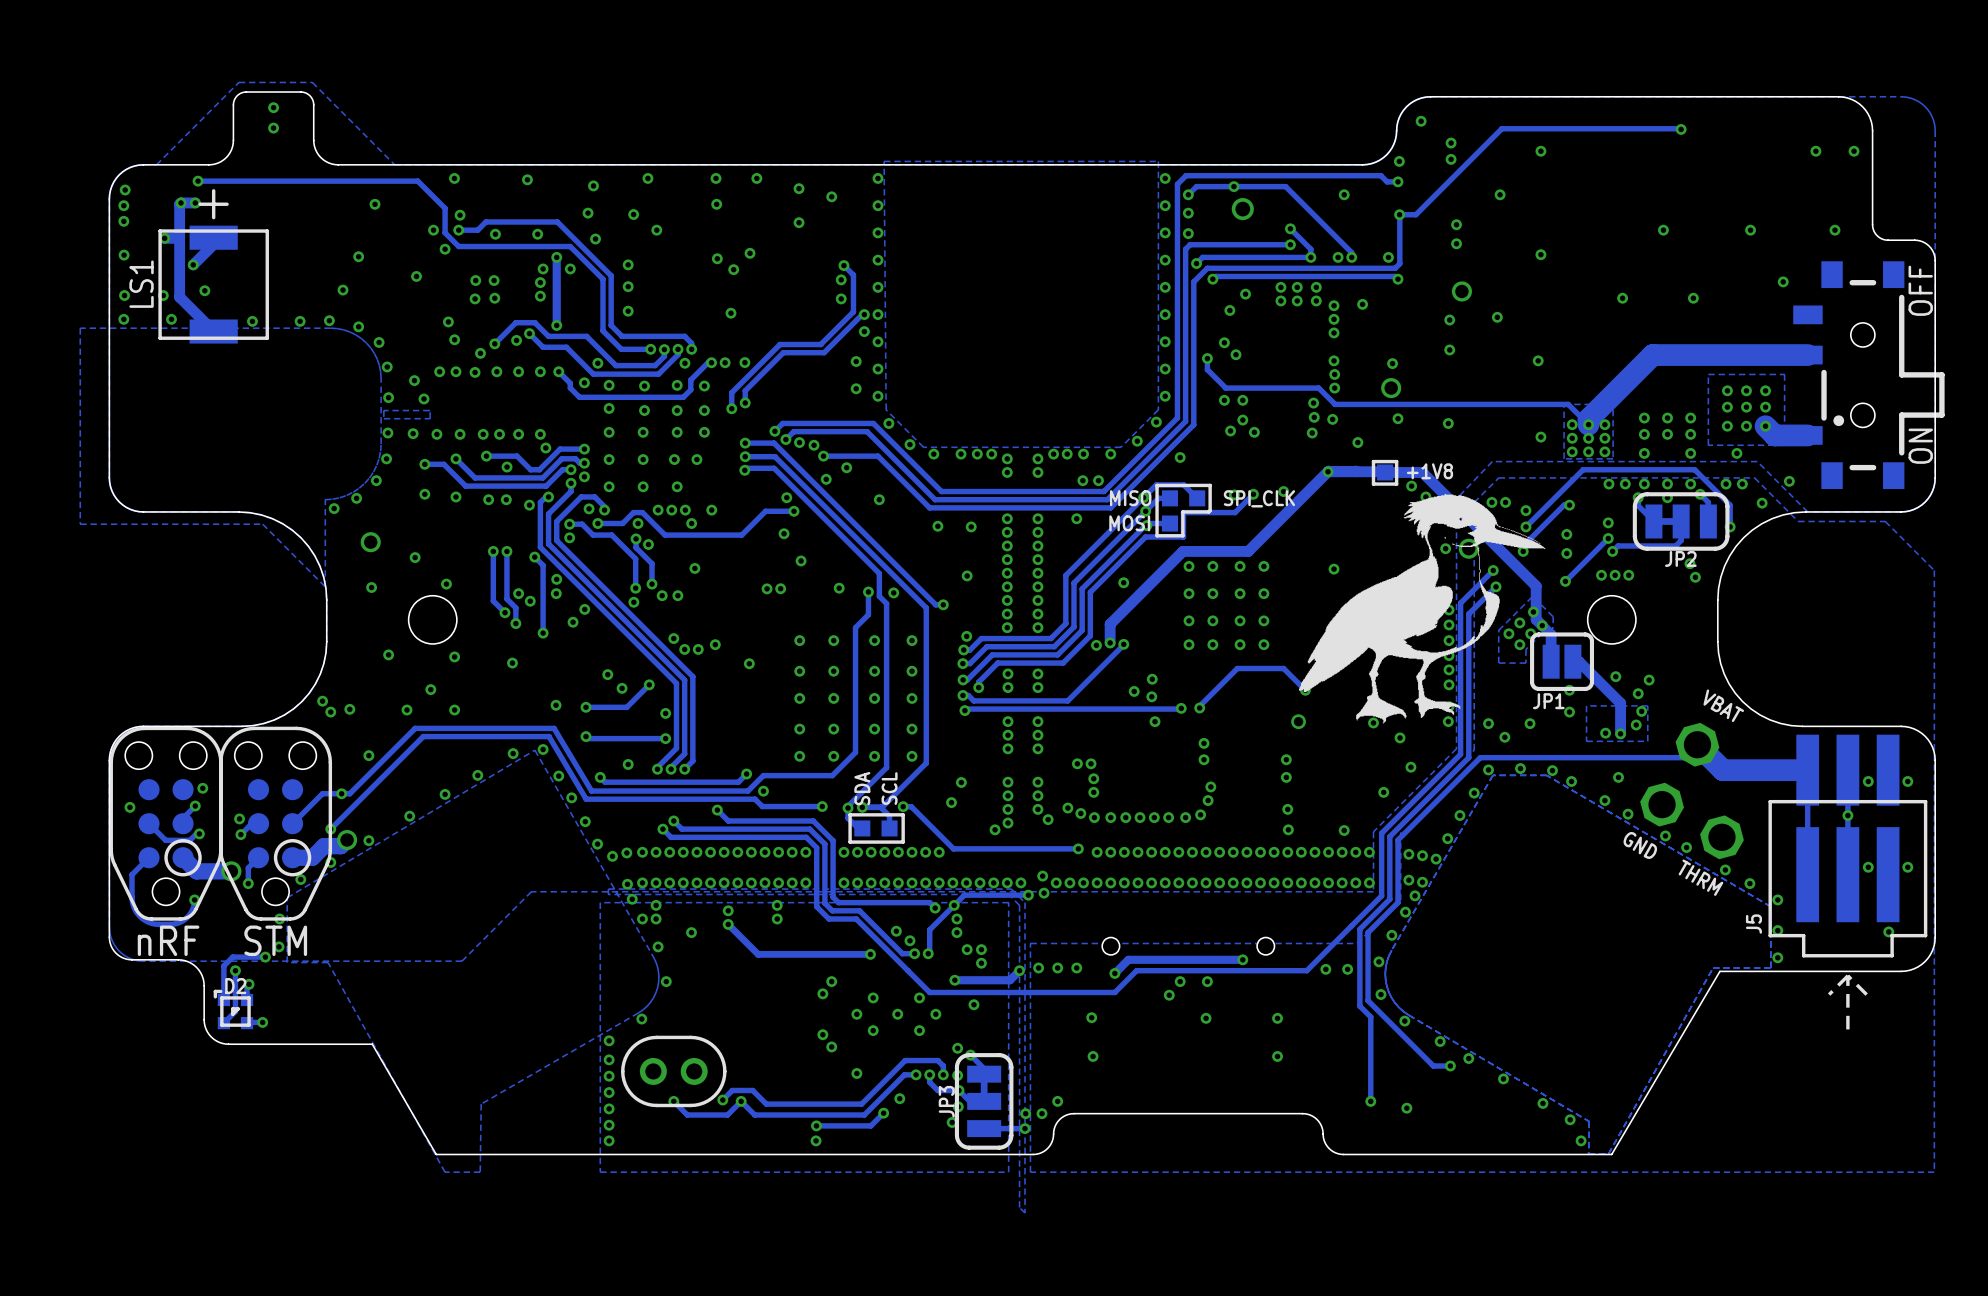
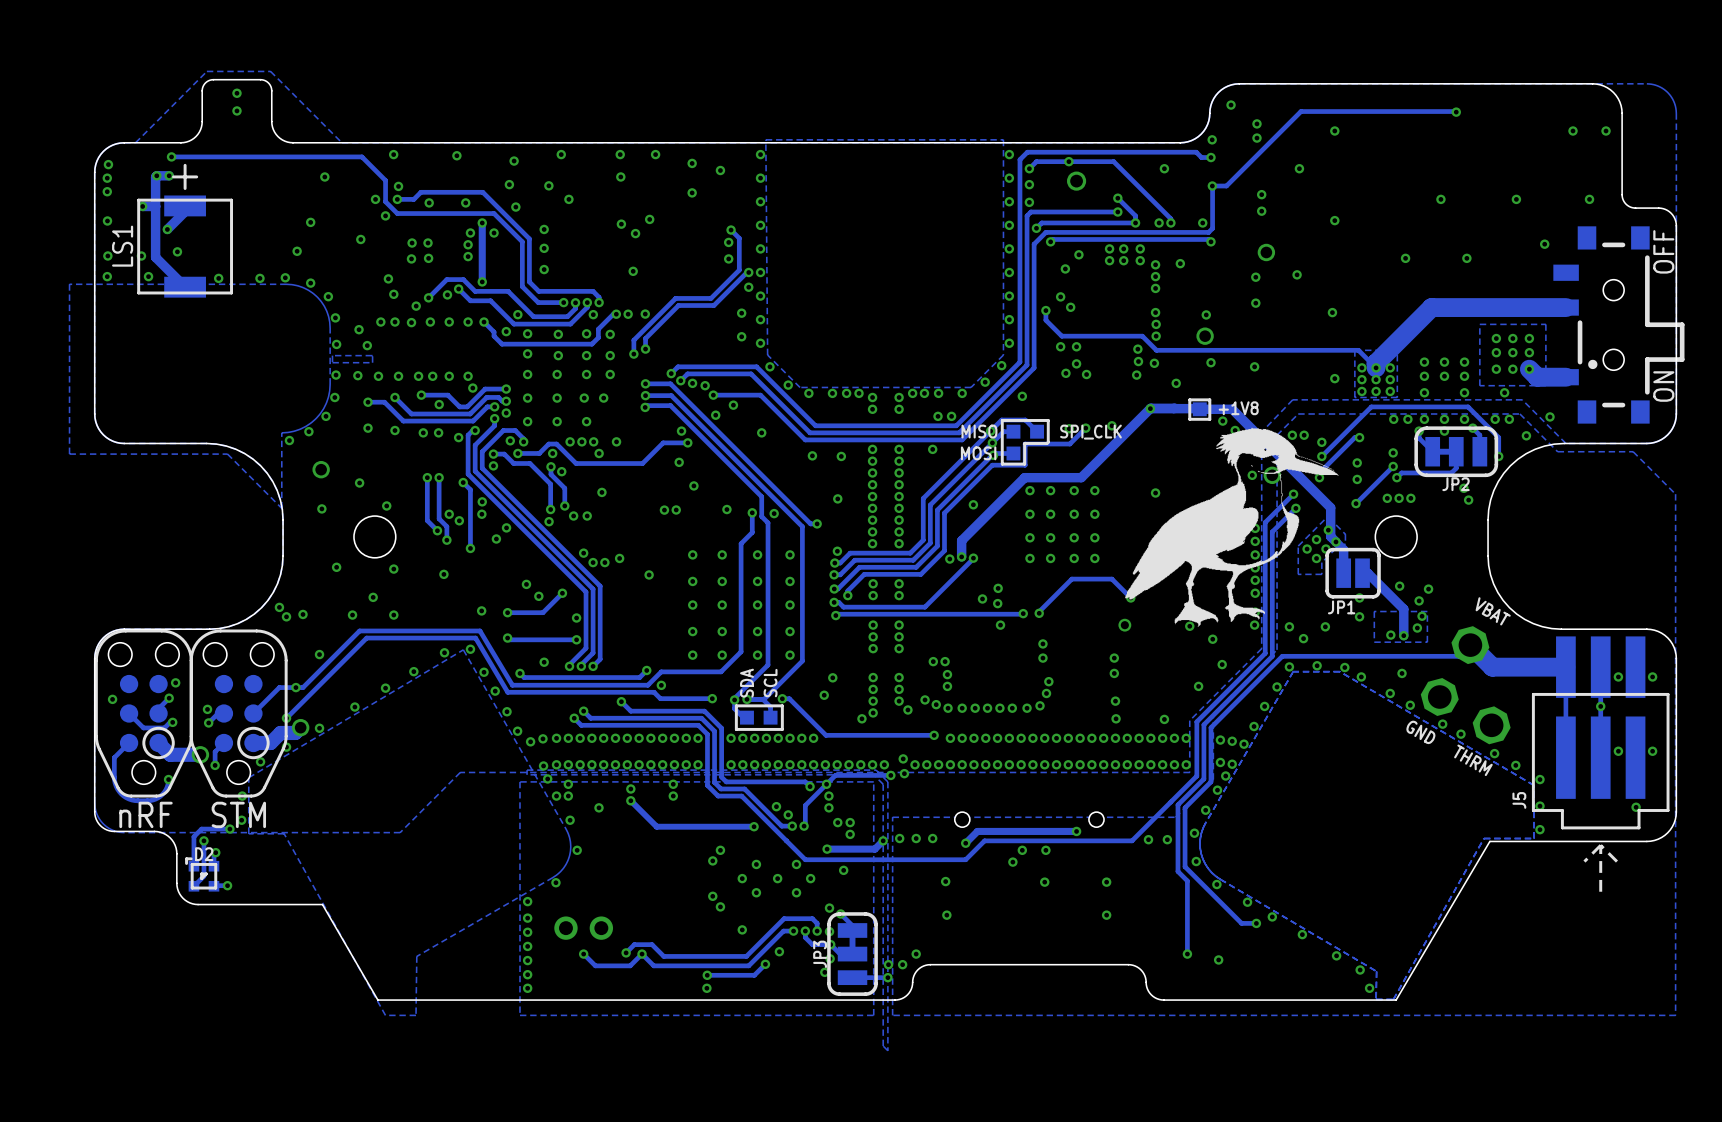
part footprint: [621, 1035, 727, 1108] -> [554, 916, 614, 940]

